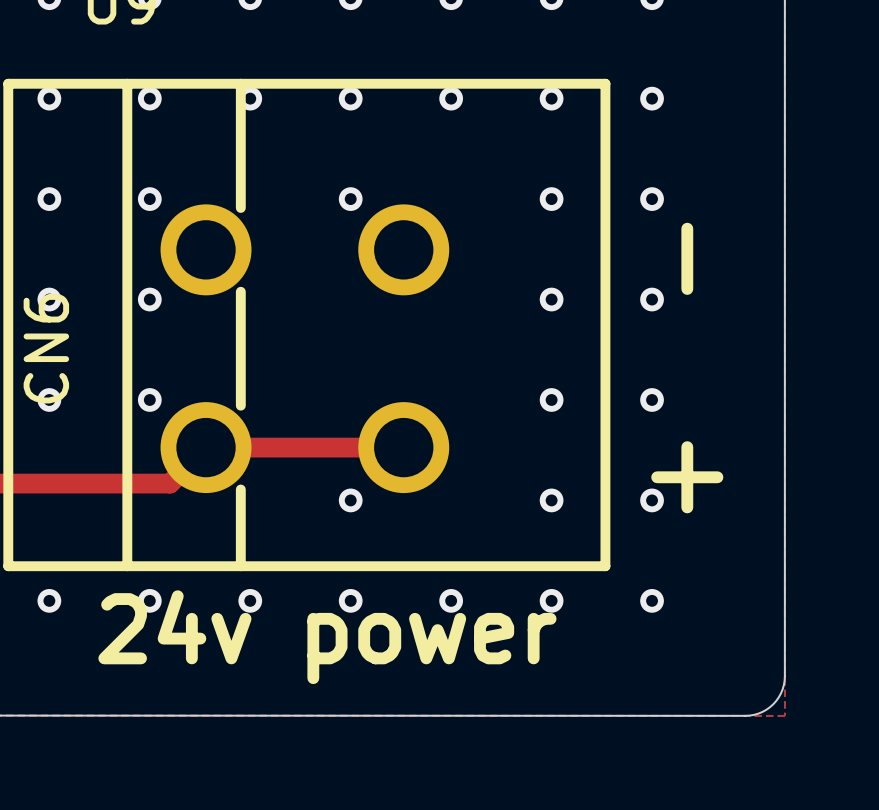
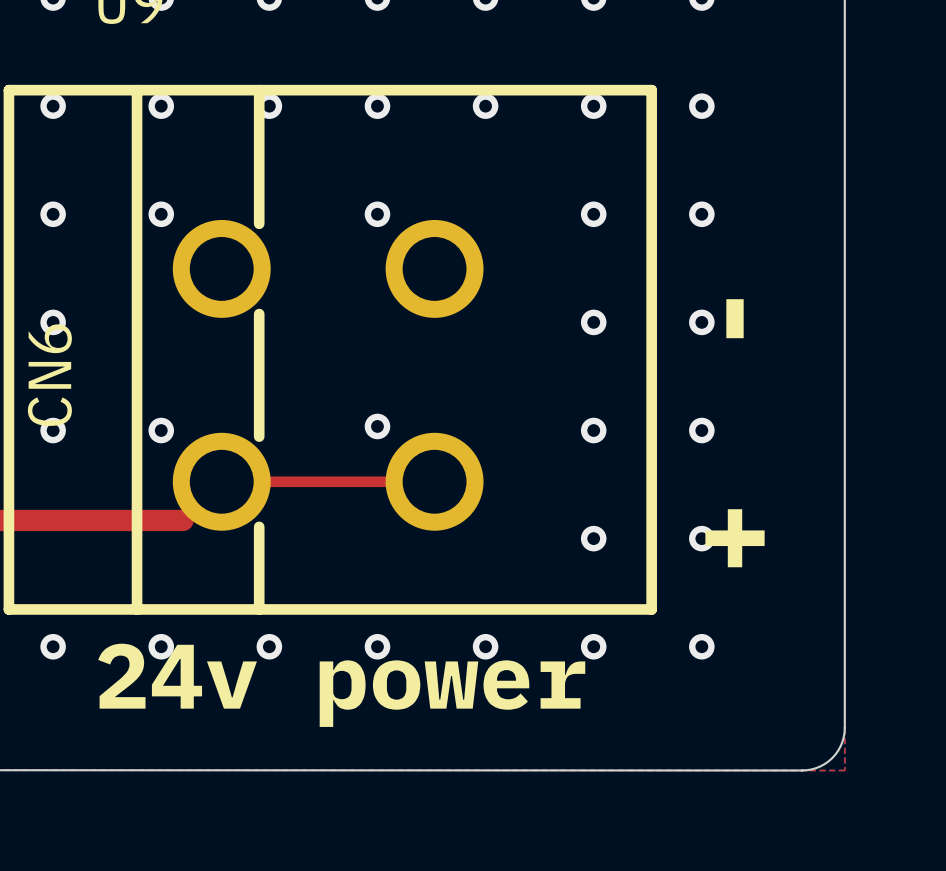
via: (149, 299) -> none
top track width: thick (403, 447) (206, 447) (170, 483) -> thin (434, 481) (221, 481) (183, 520)
via position: (350, 500) -> (377, 426)

